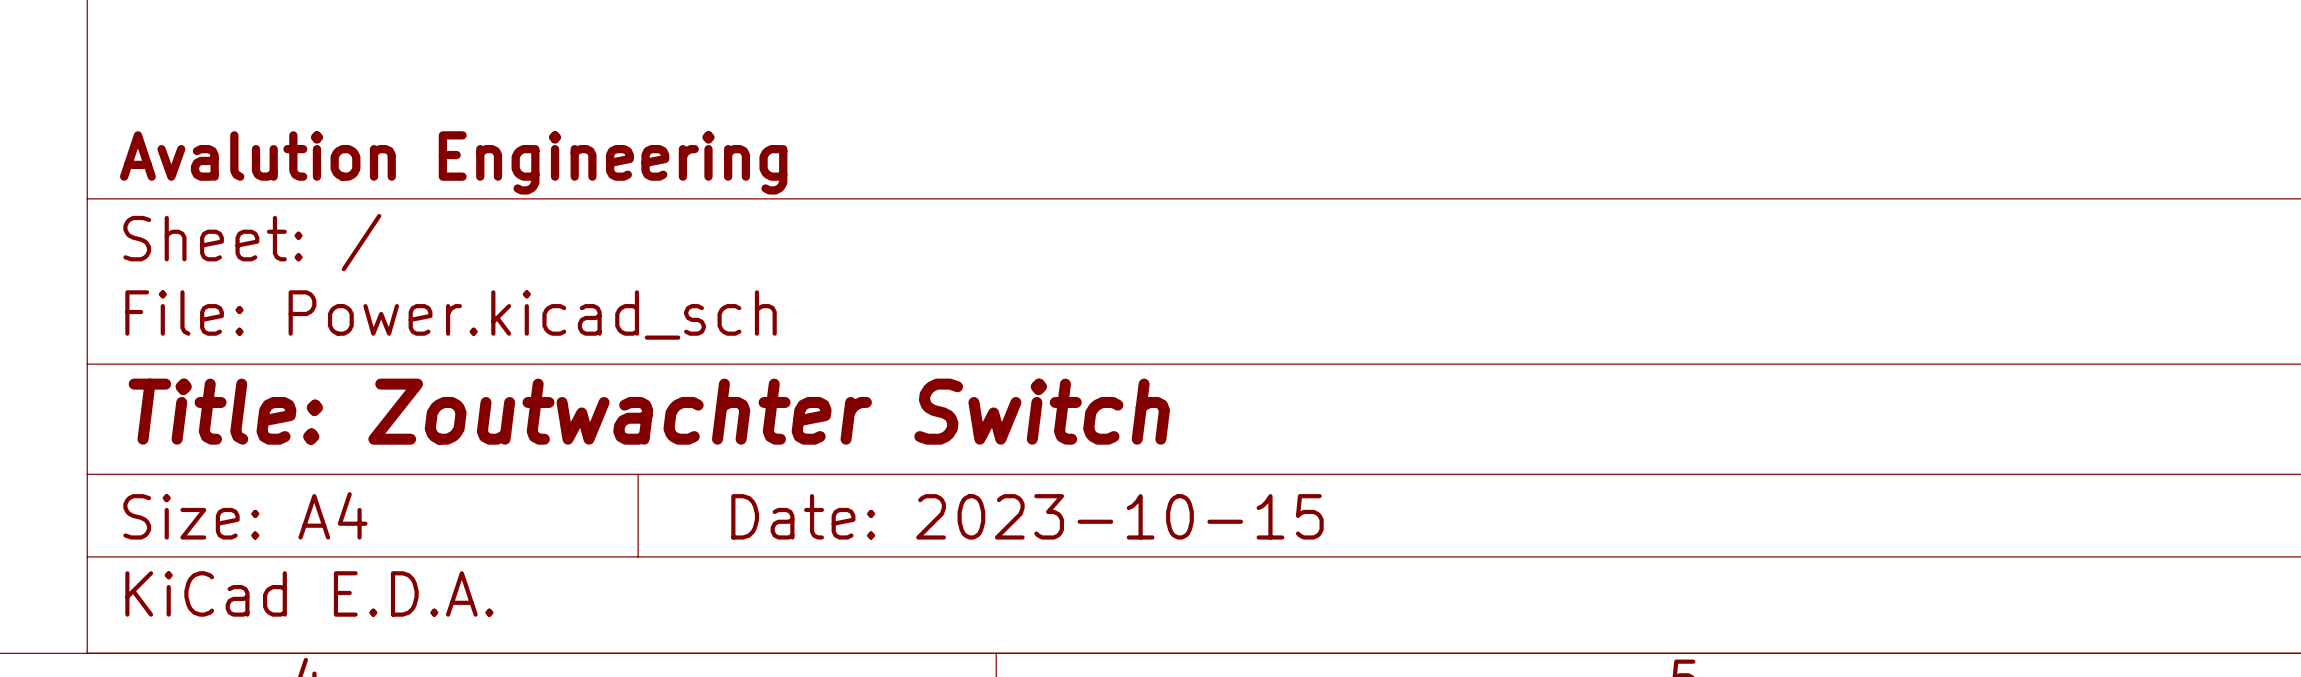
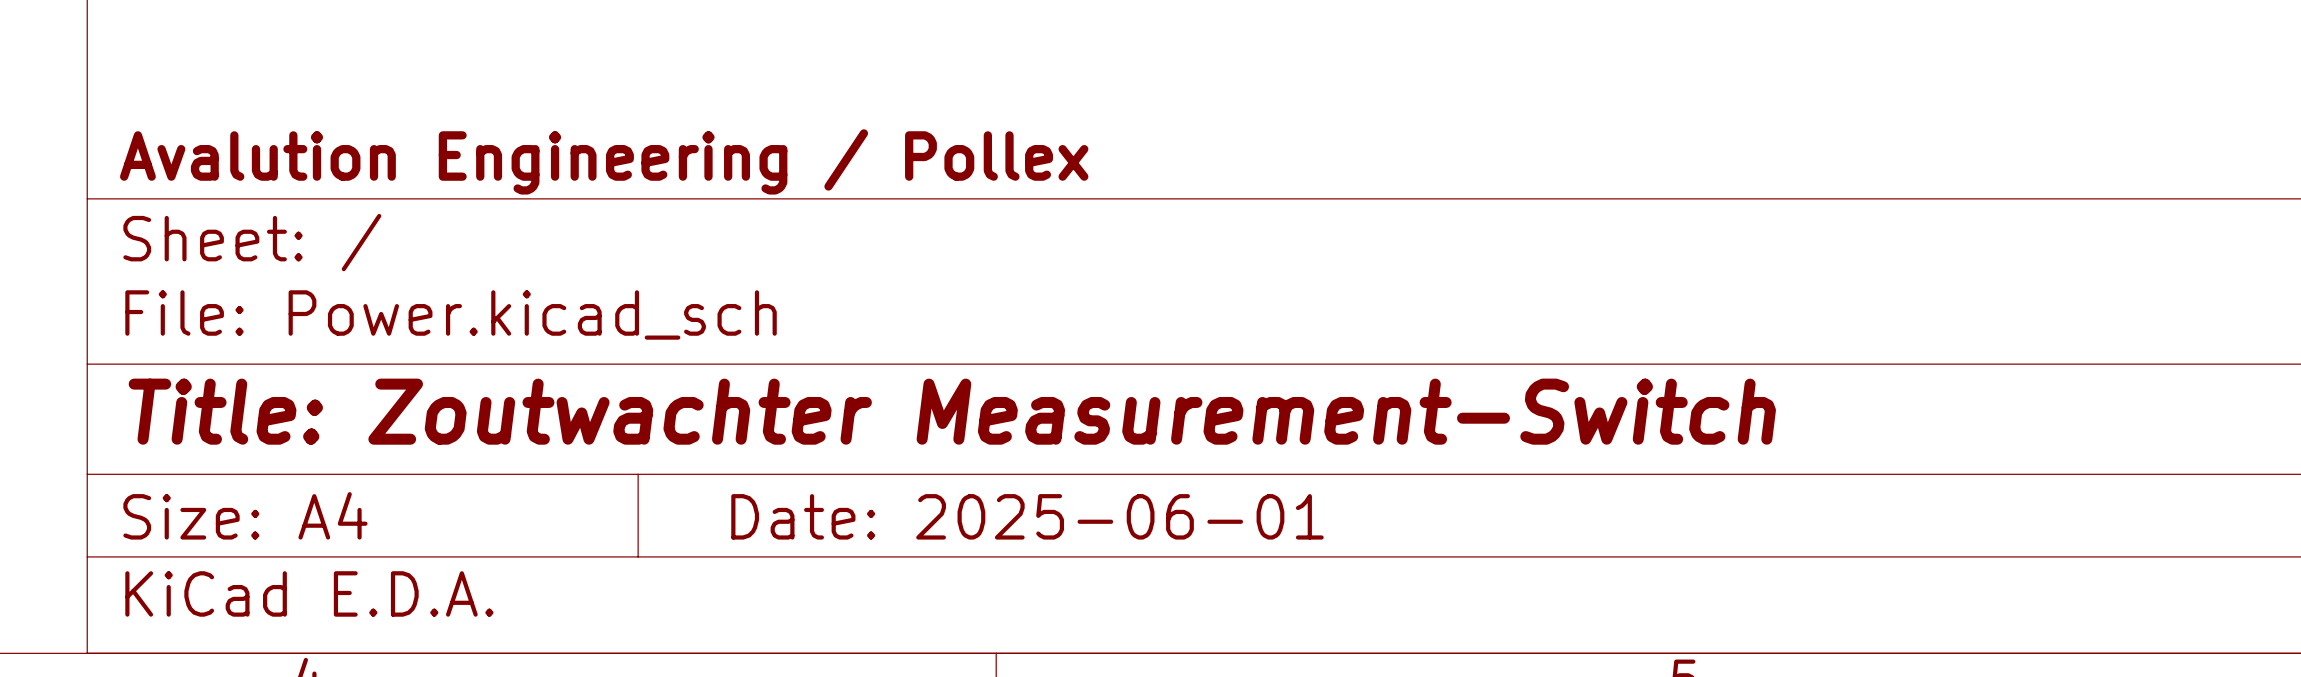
title block: Avalution Engineering (453, 162) -> Avalution Engineering / Pollex (604, 161)
title block: Title: Zoutwachter Switch (649, 411) -> Title: Zoutwachter Measurement-Switch (952, 411)
title block: Date: 2023-10-15 (1027, 516) -> Date: 2025-06-01 (1027, 516)

